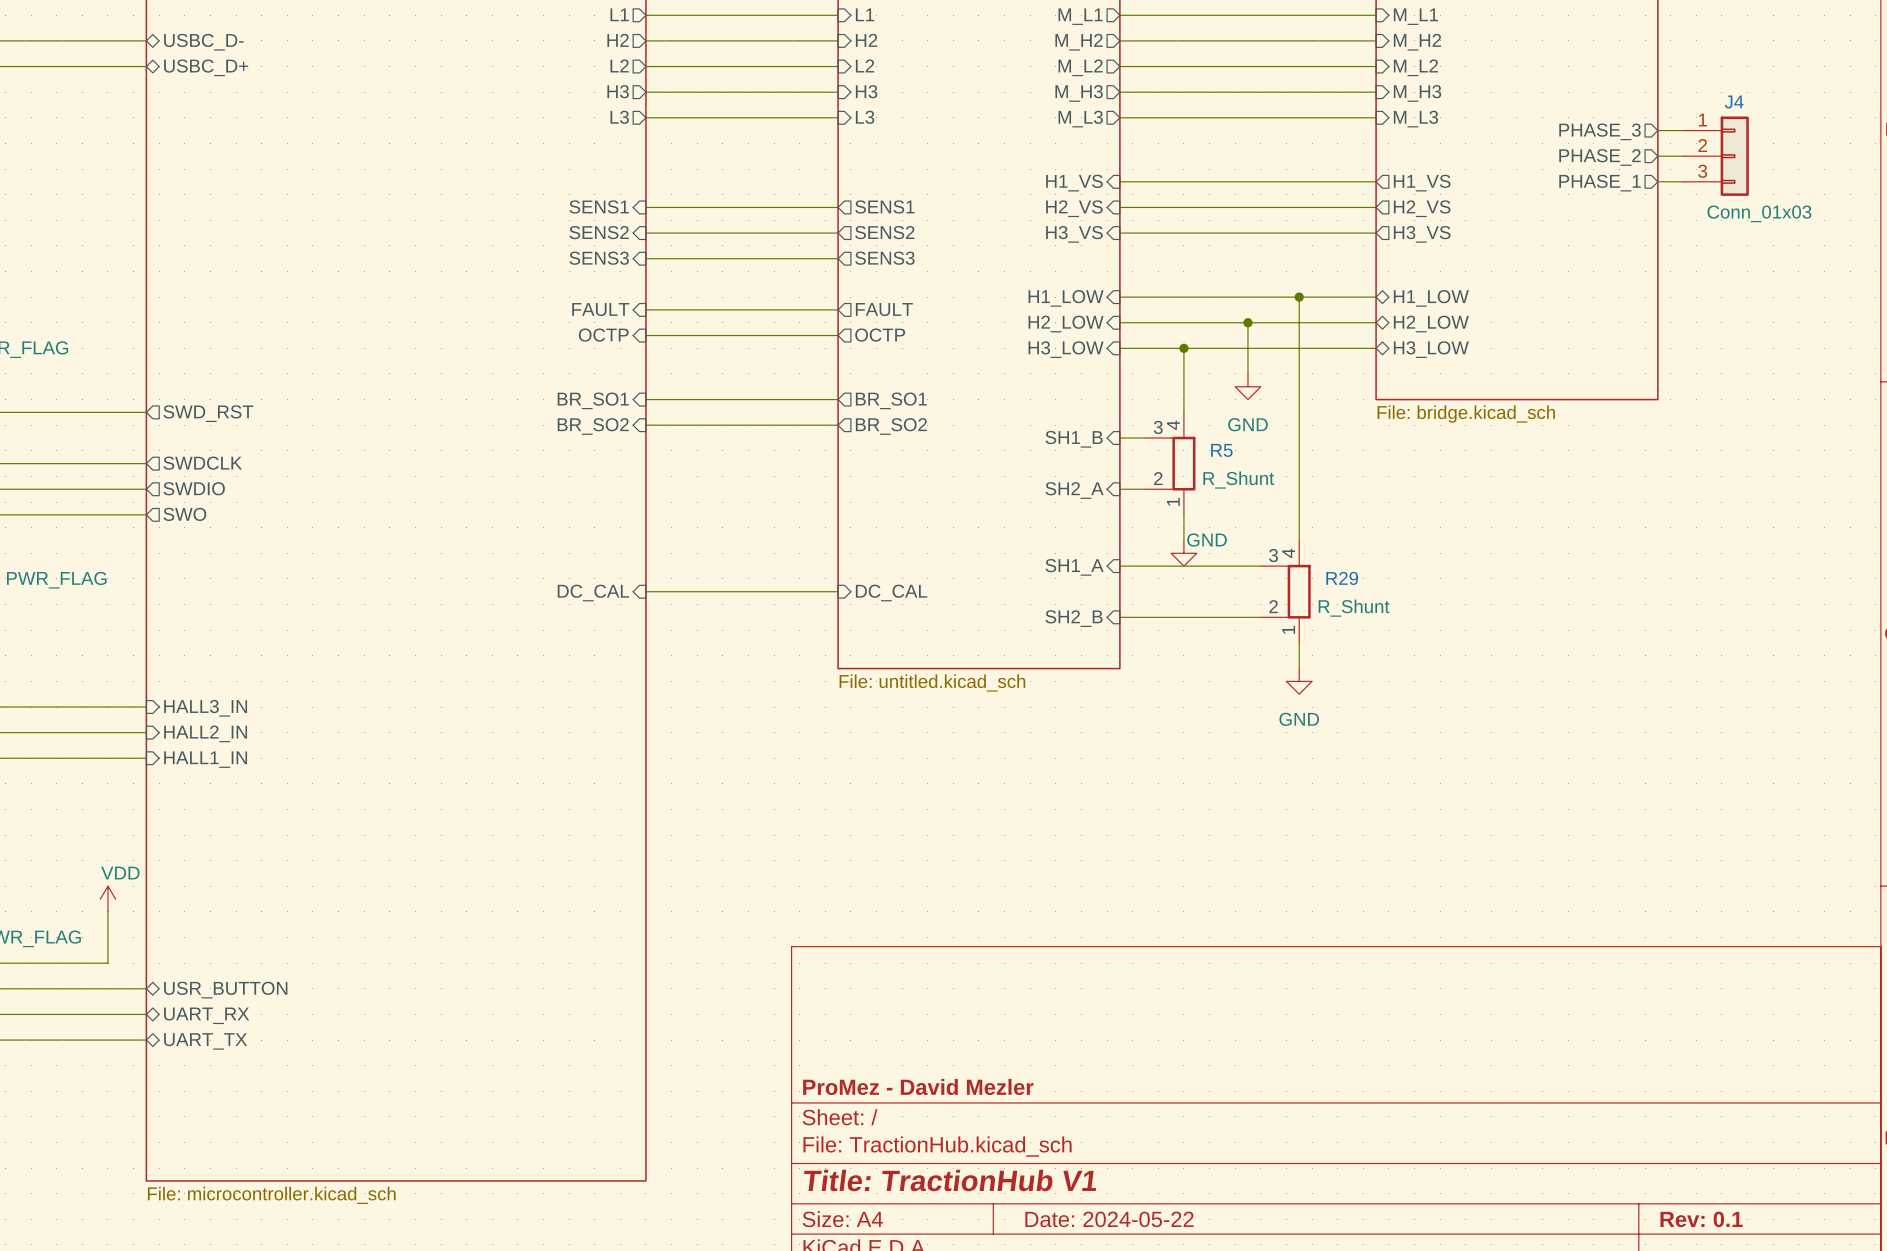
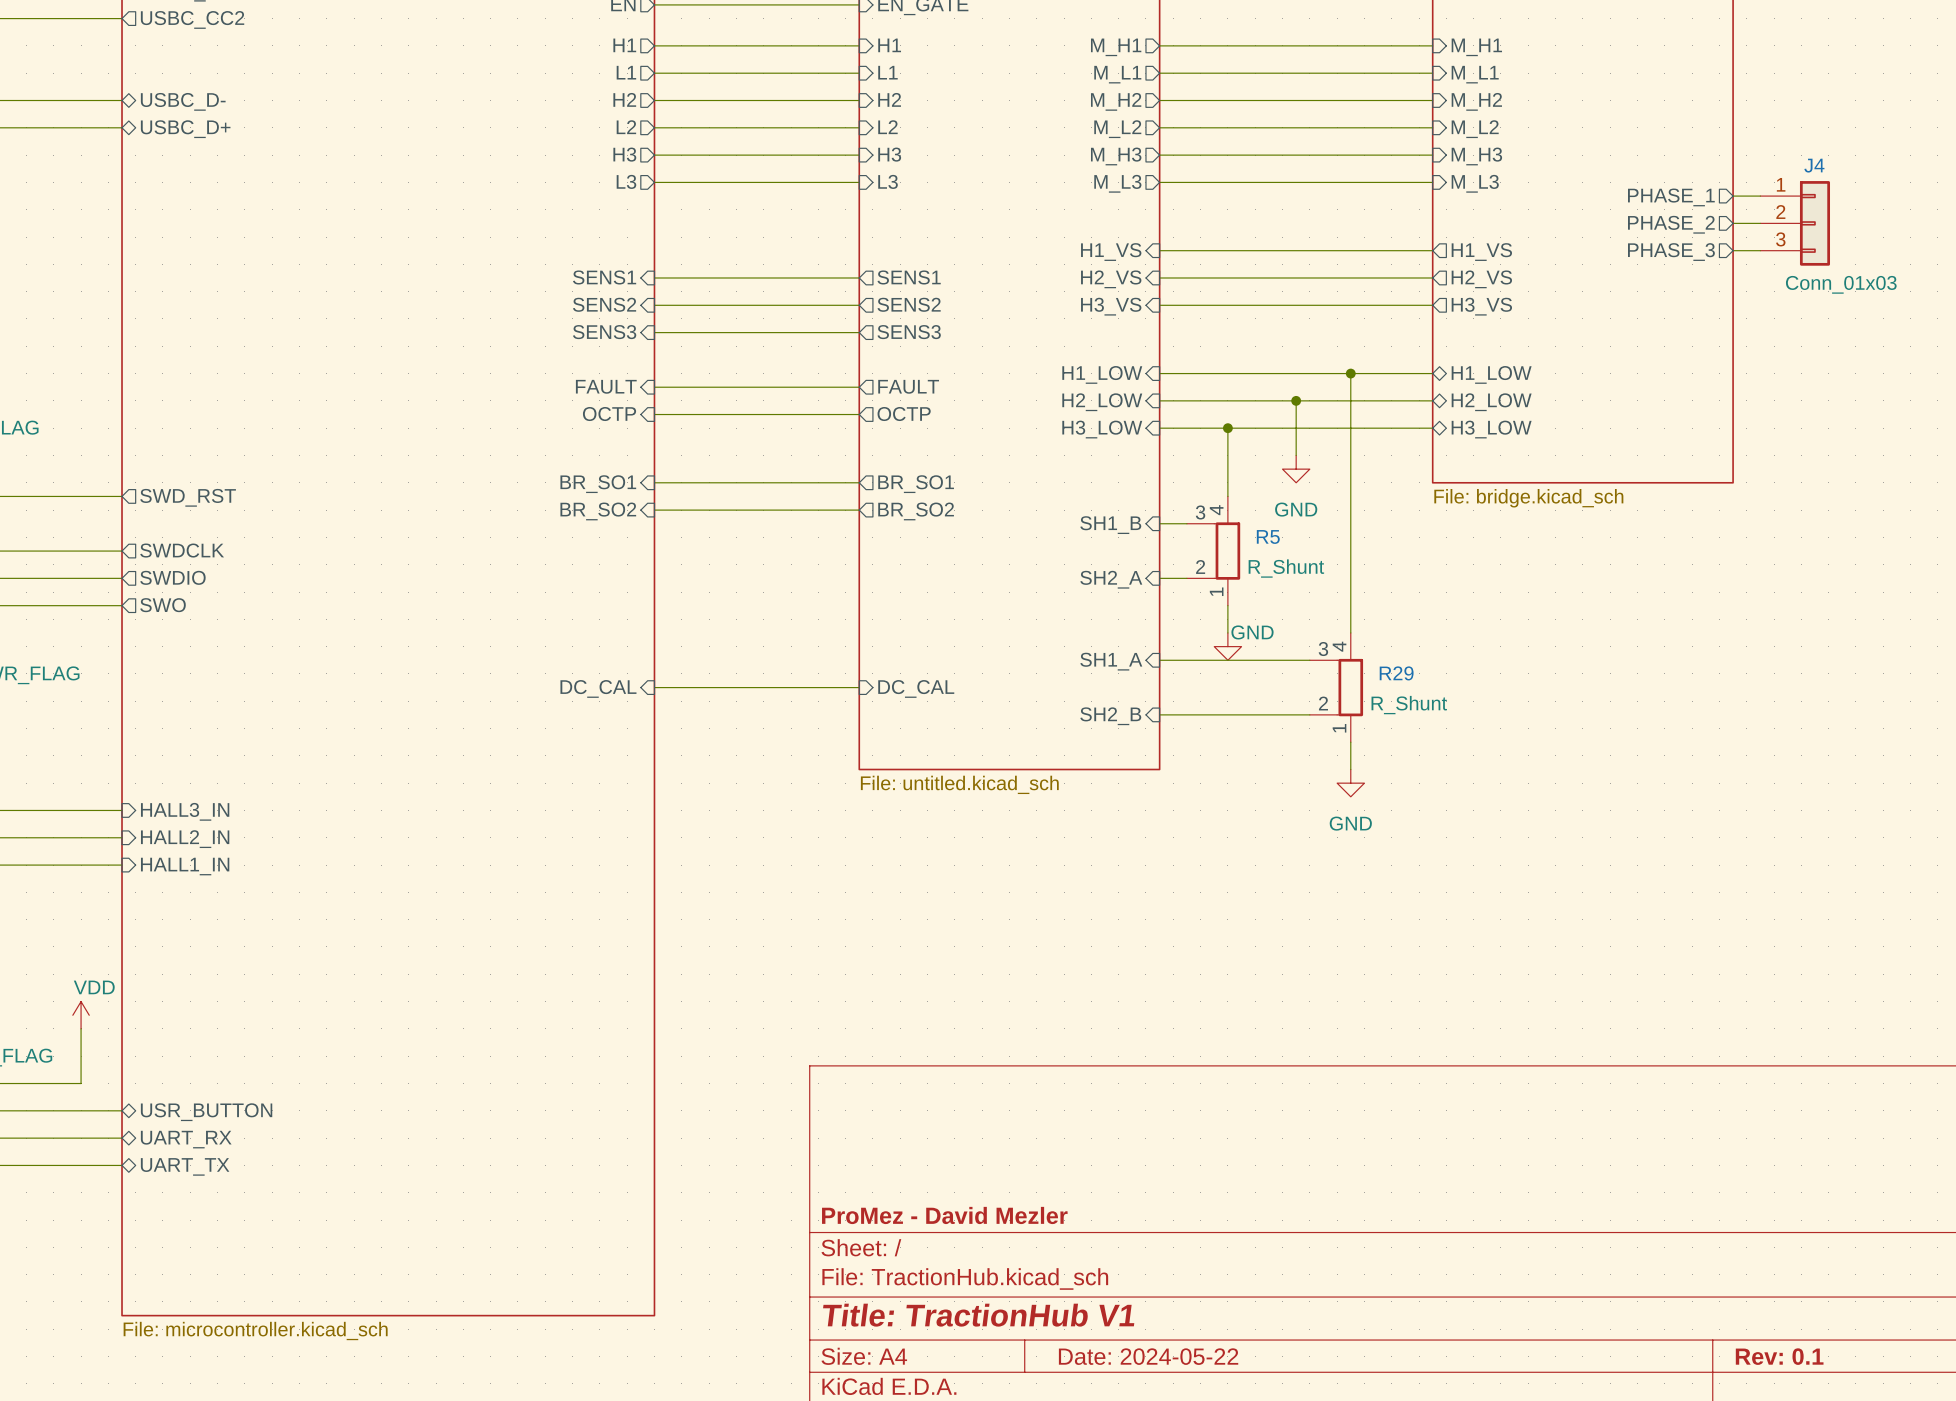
sheet pin: PHASE_3 (1600, 131) -> PHASE_1 (1671, 197)
sheet pin: PHASE_1 (1600, 183) -> PHASE_3 (1671, 252)

